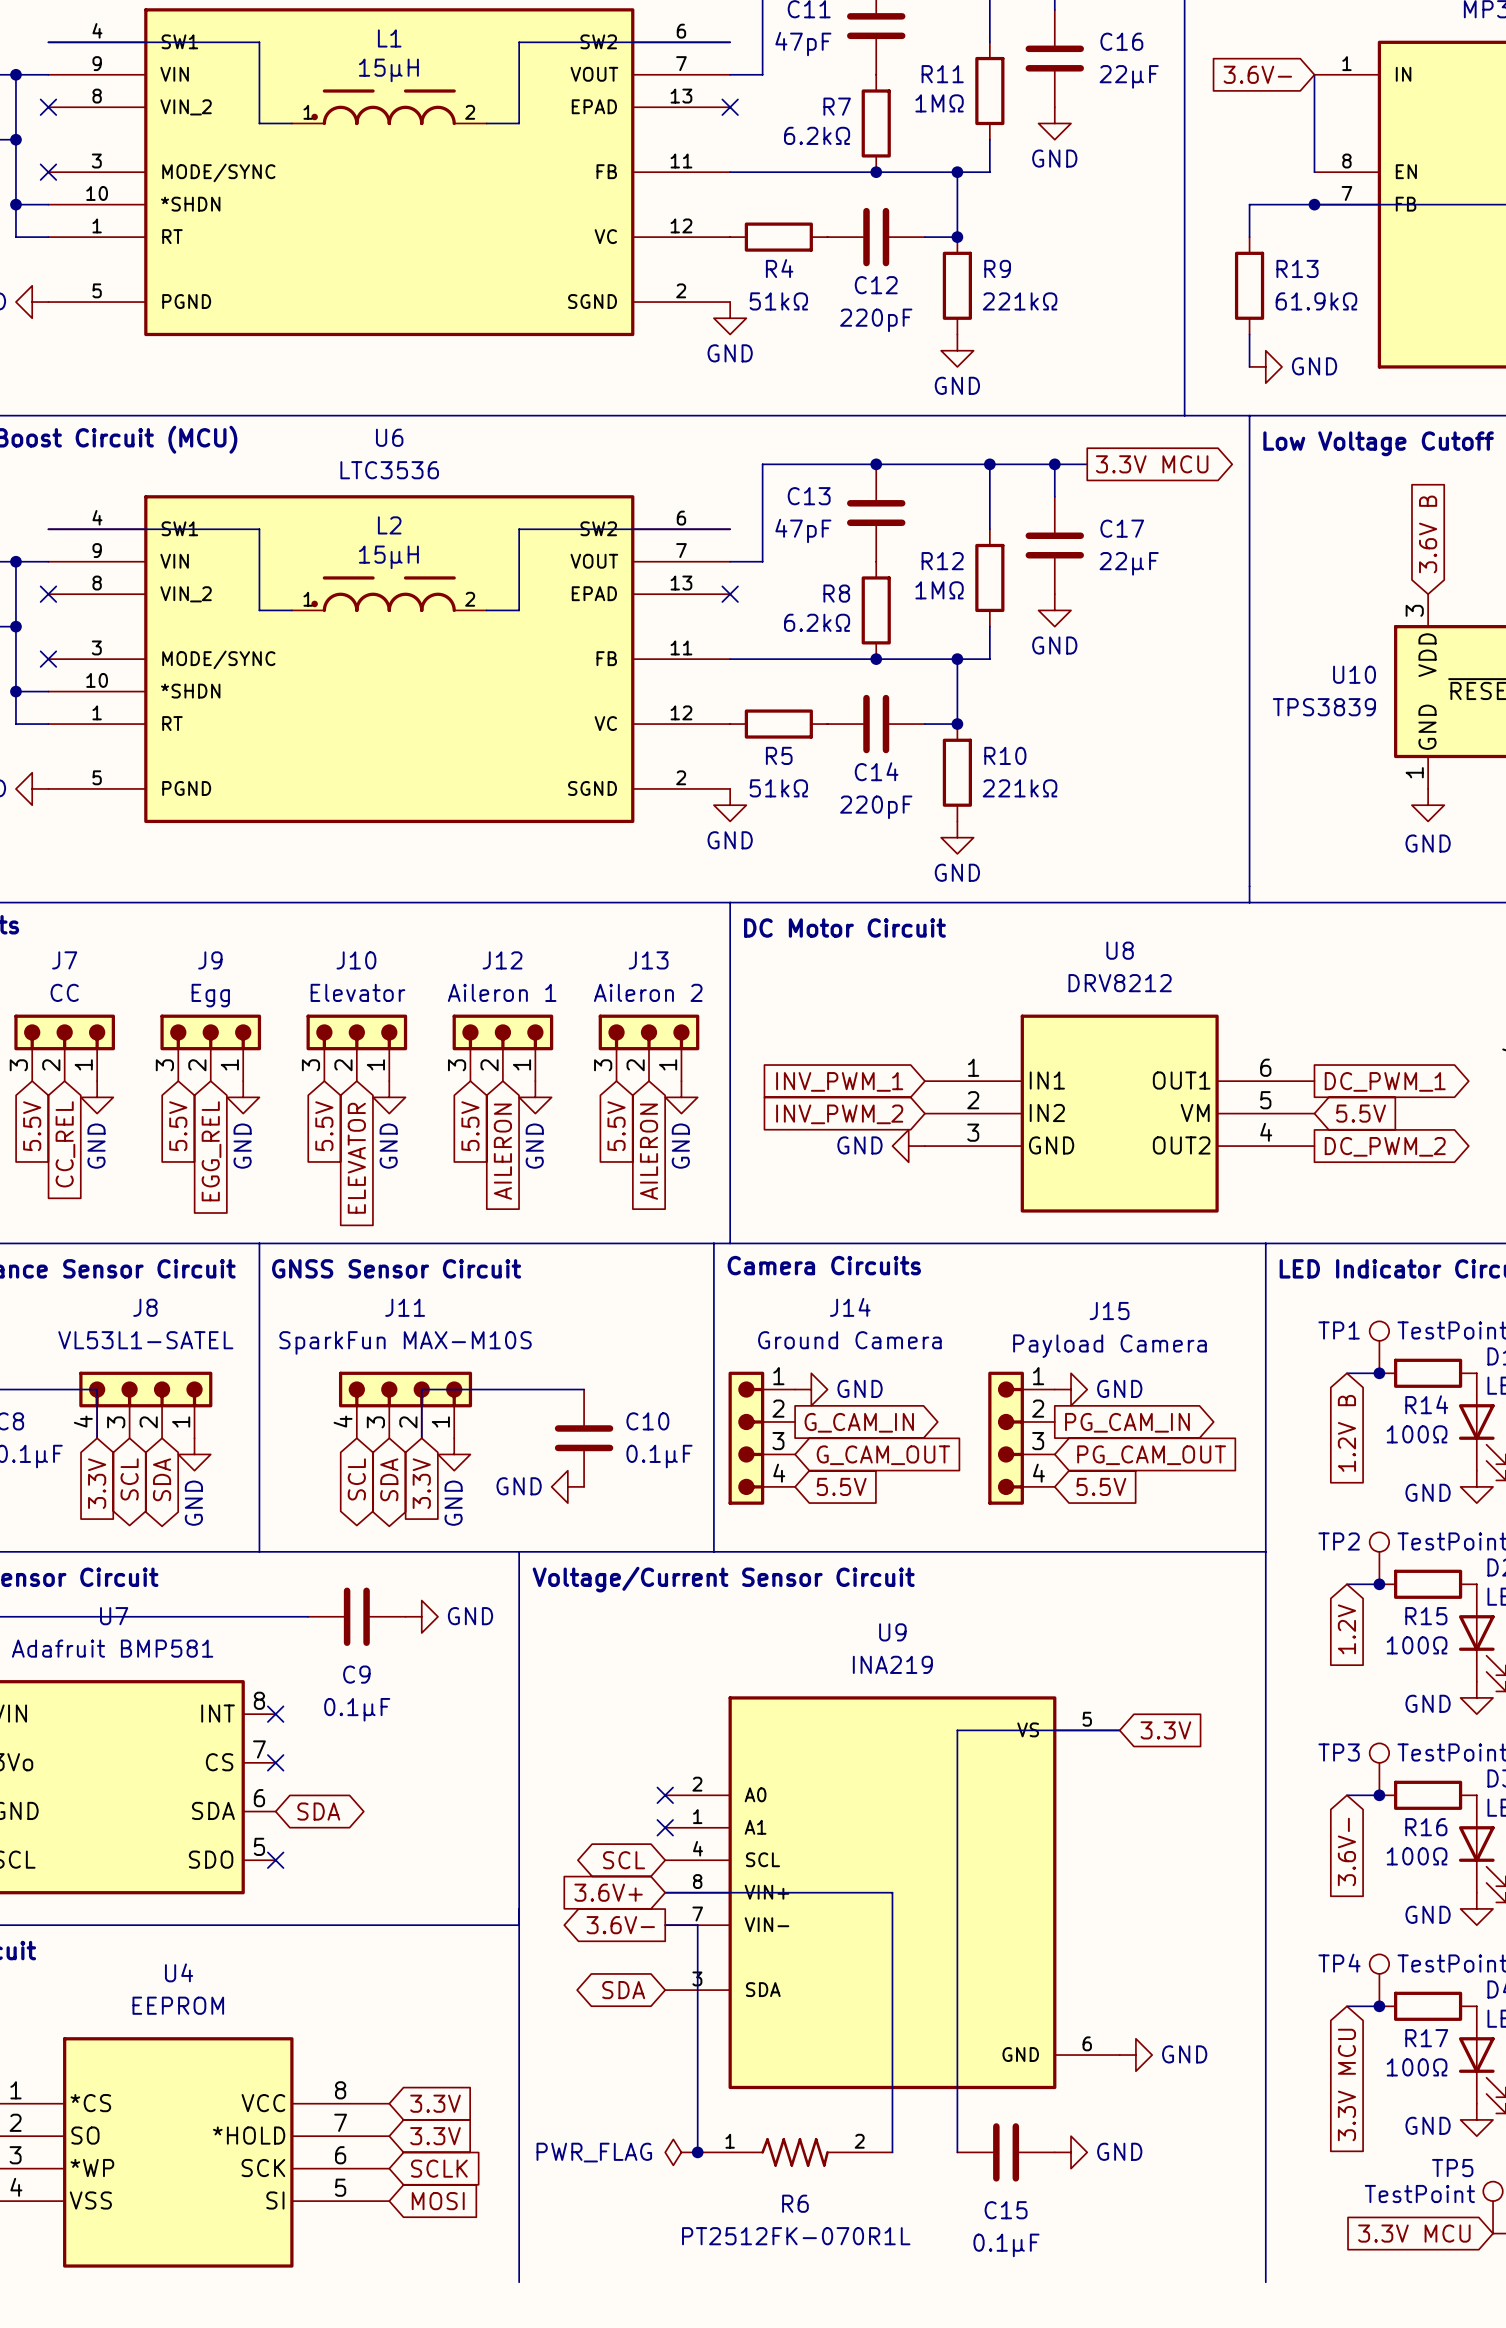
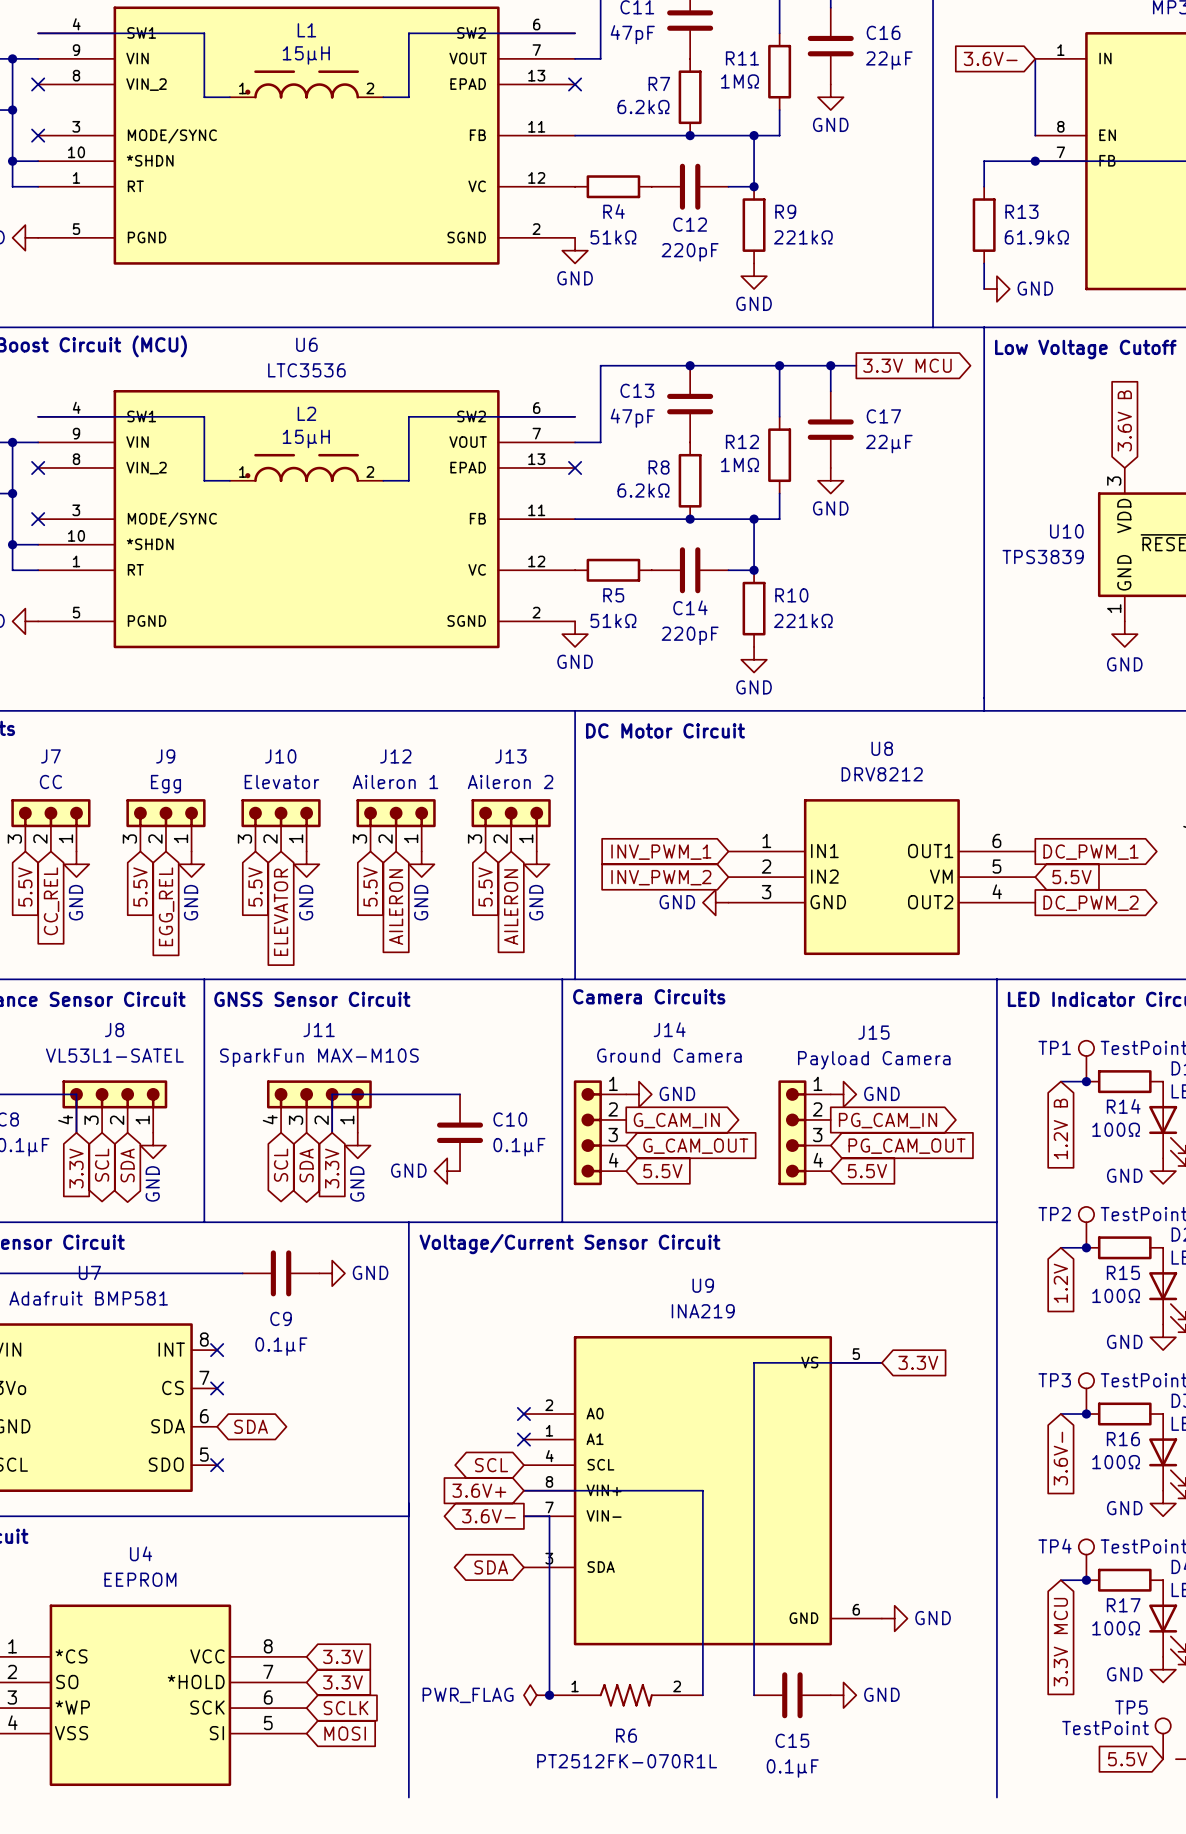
TP5 position: (1493, 2207) -> (1163, 1738)
global label: 3.3V MCU (1414, 2233) -> none
global label: none -> 5.5V (1127, 1759)

